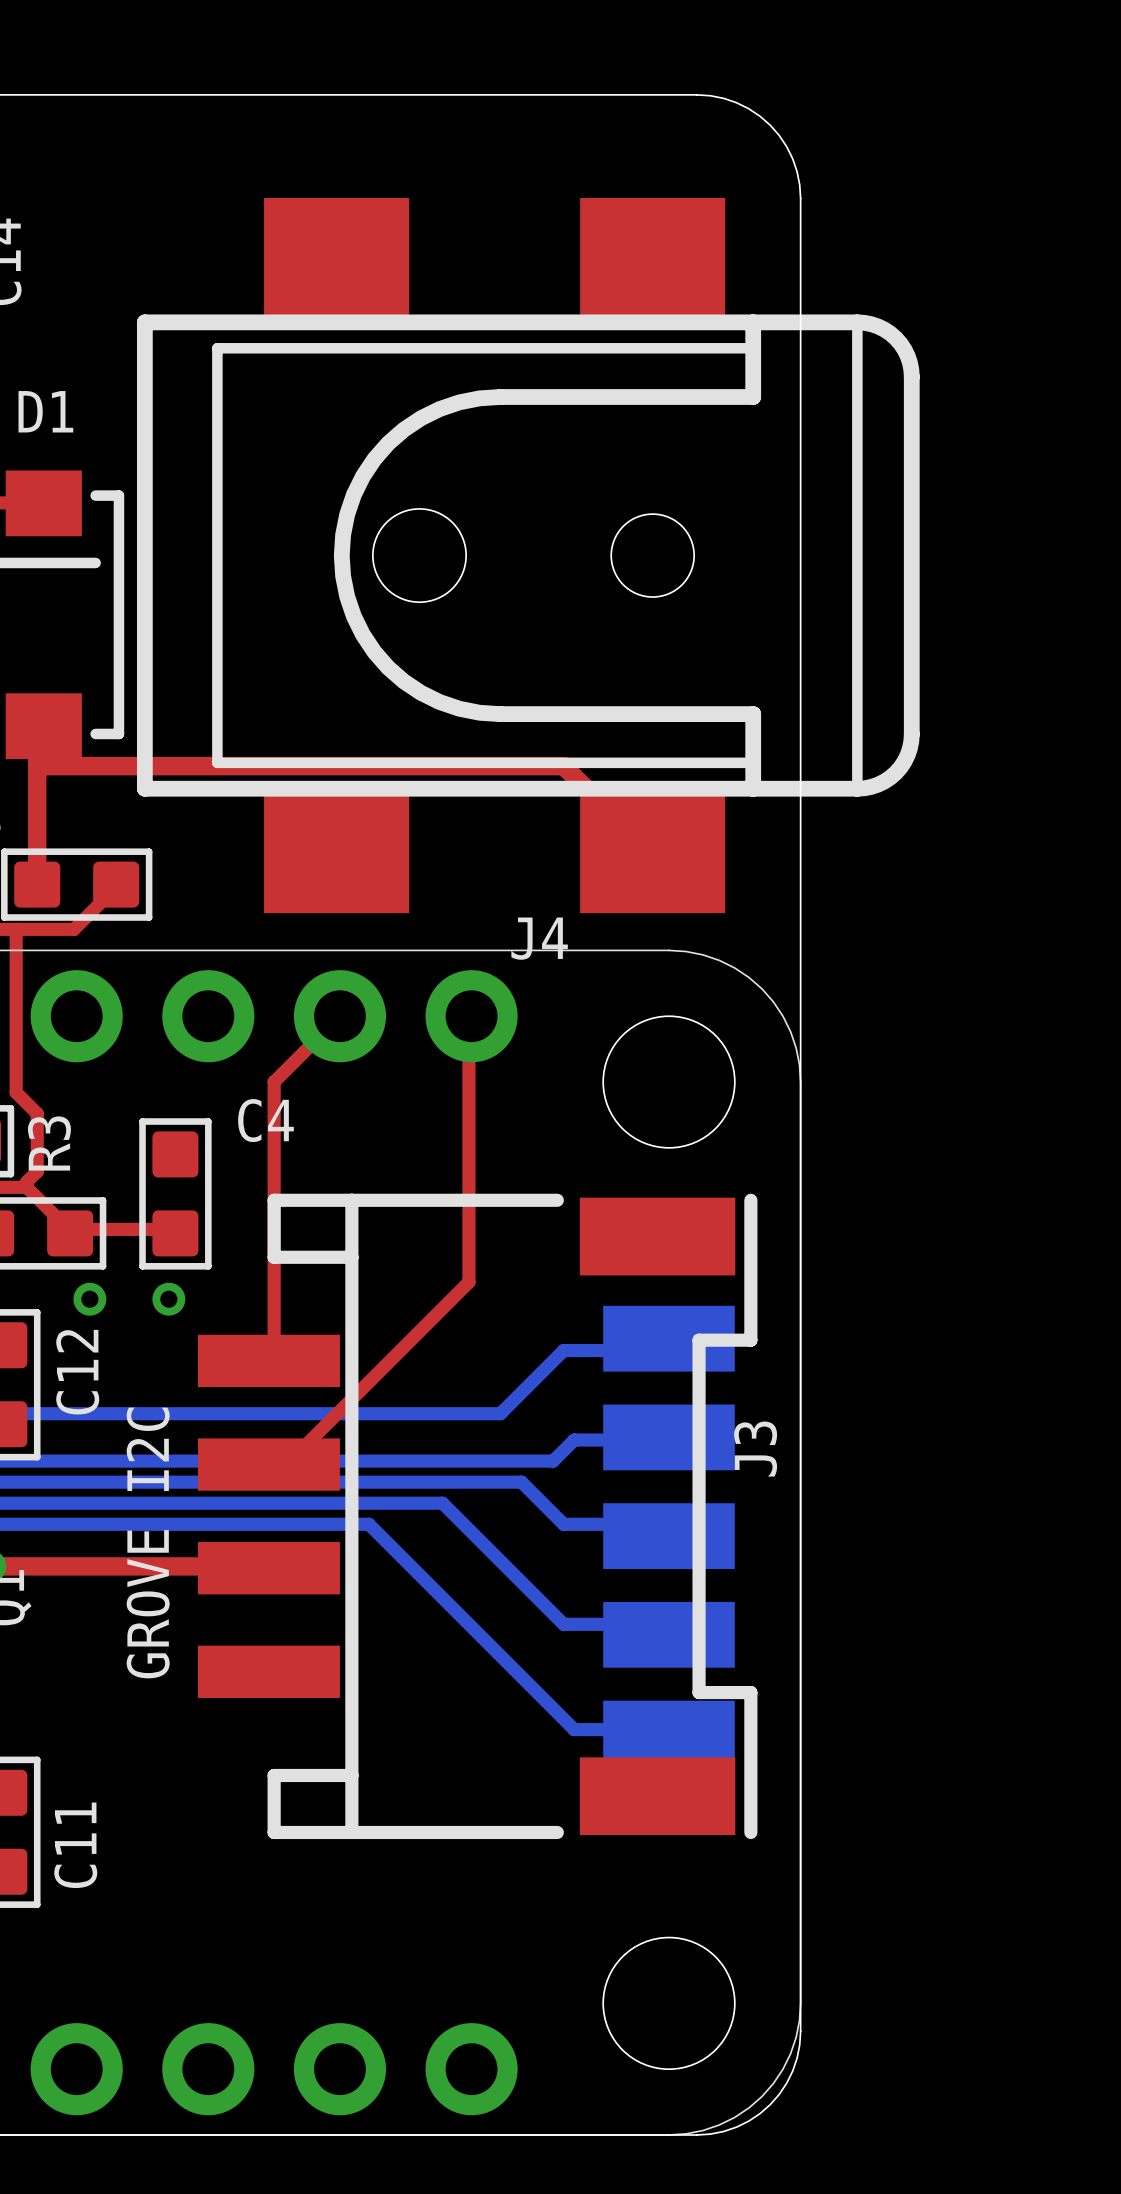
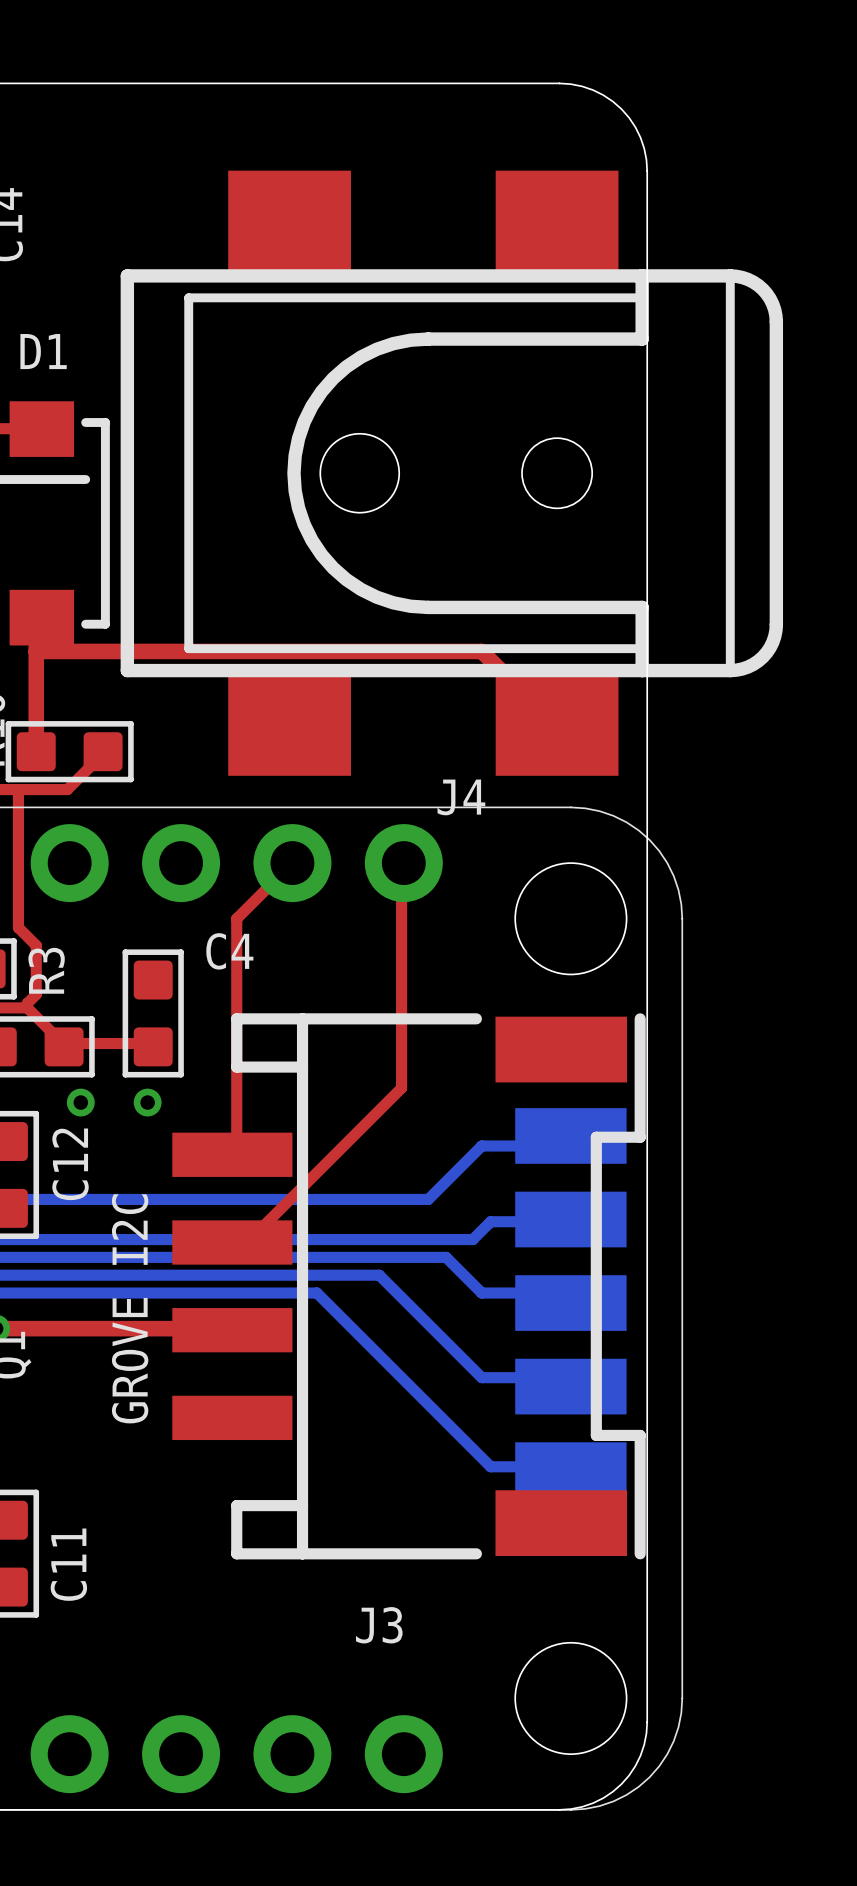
board edge: (655, 94) (696, 94) (723, 98) (748, 108) (760, 116) (779, 135) (792, 158) (797, 171) (800, 198) (799, 2044) (792, 2071) (786, 2083) (770, 2104) (748, 2121) (736, 2127) (710, 2134) (655, 2134) -> (559, 83) (593, 90) (621, 109) (640, 137) (647, 171) (647, 1722) (640, 1755) (621, 1784) (593, 1803) (559, 1809)
J3 name rotation: 0° (755, 1449) -> 90° clockwise (379, 1625)
J3 name position: J3 (755, 1449) -> J3 (379, 1625)

